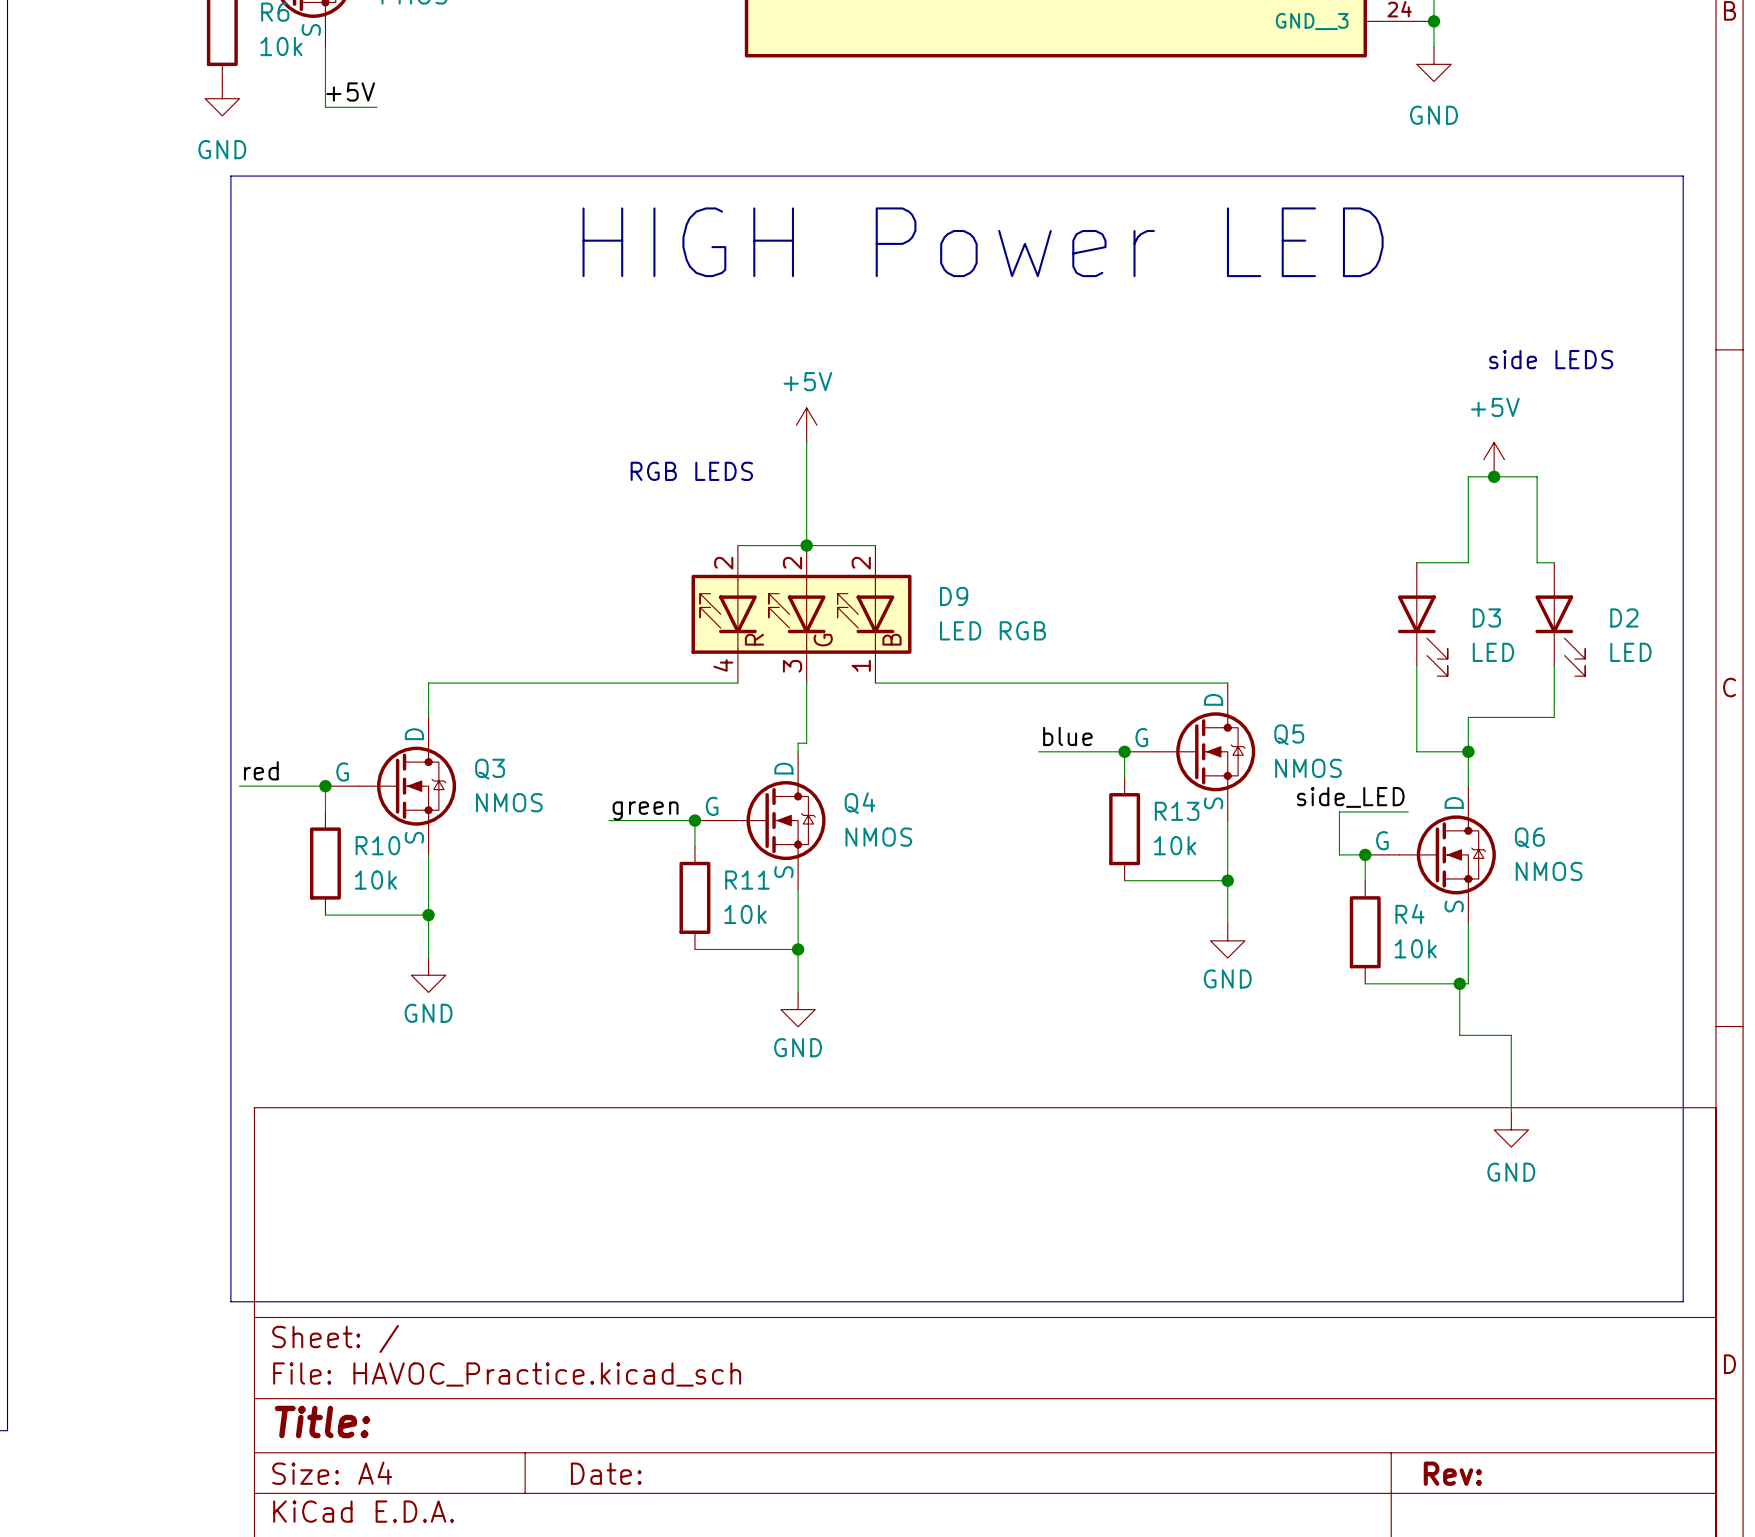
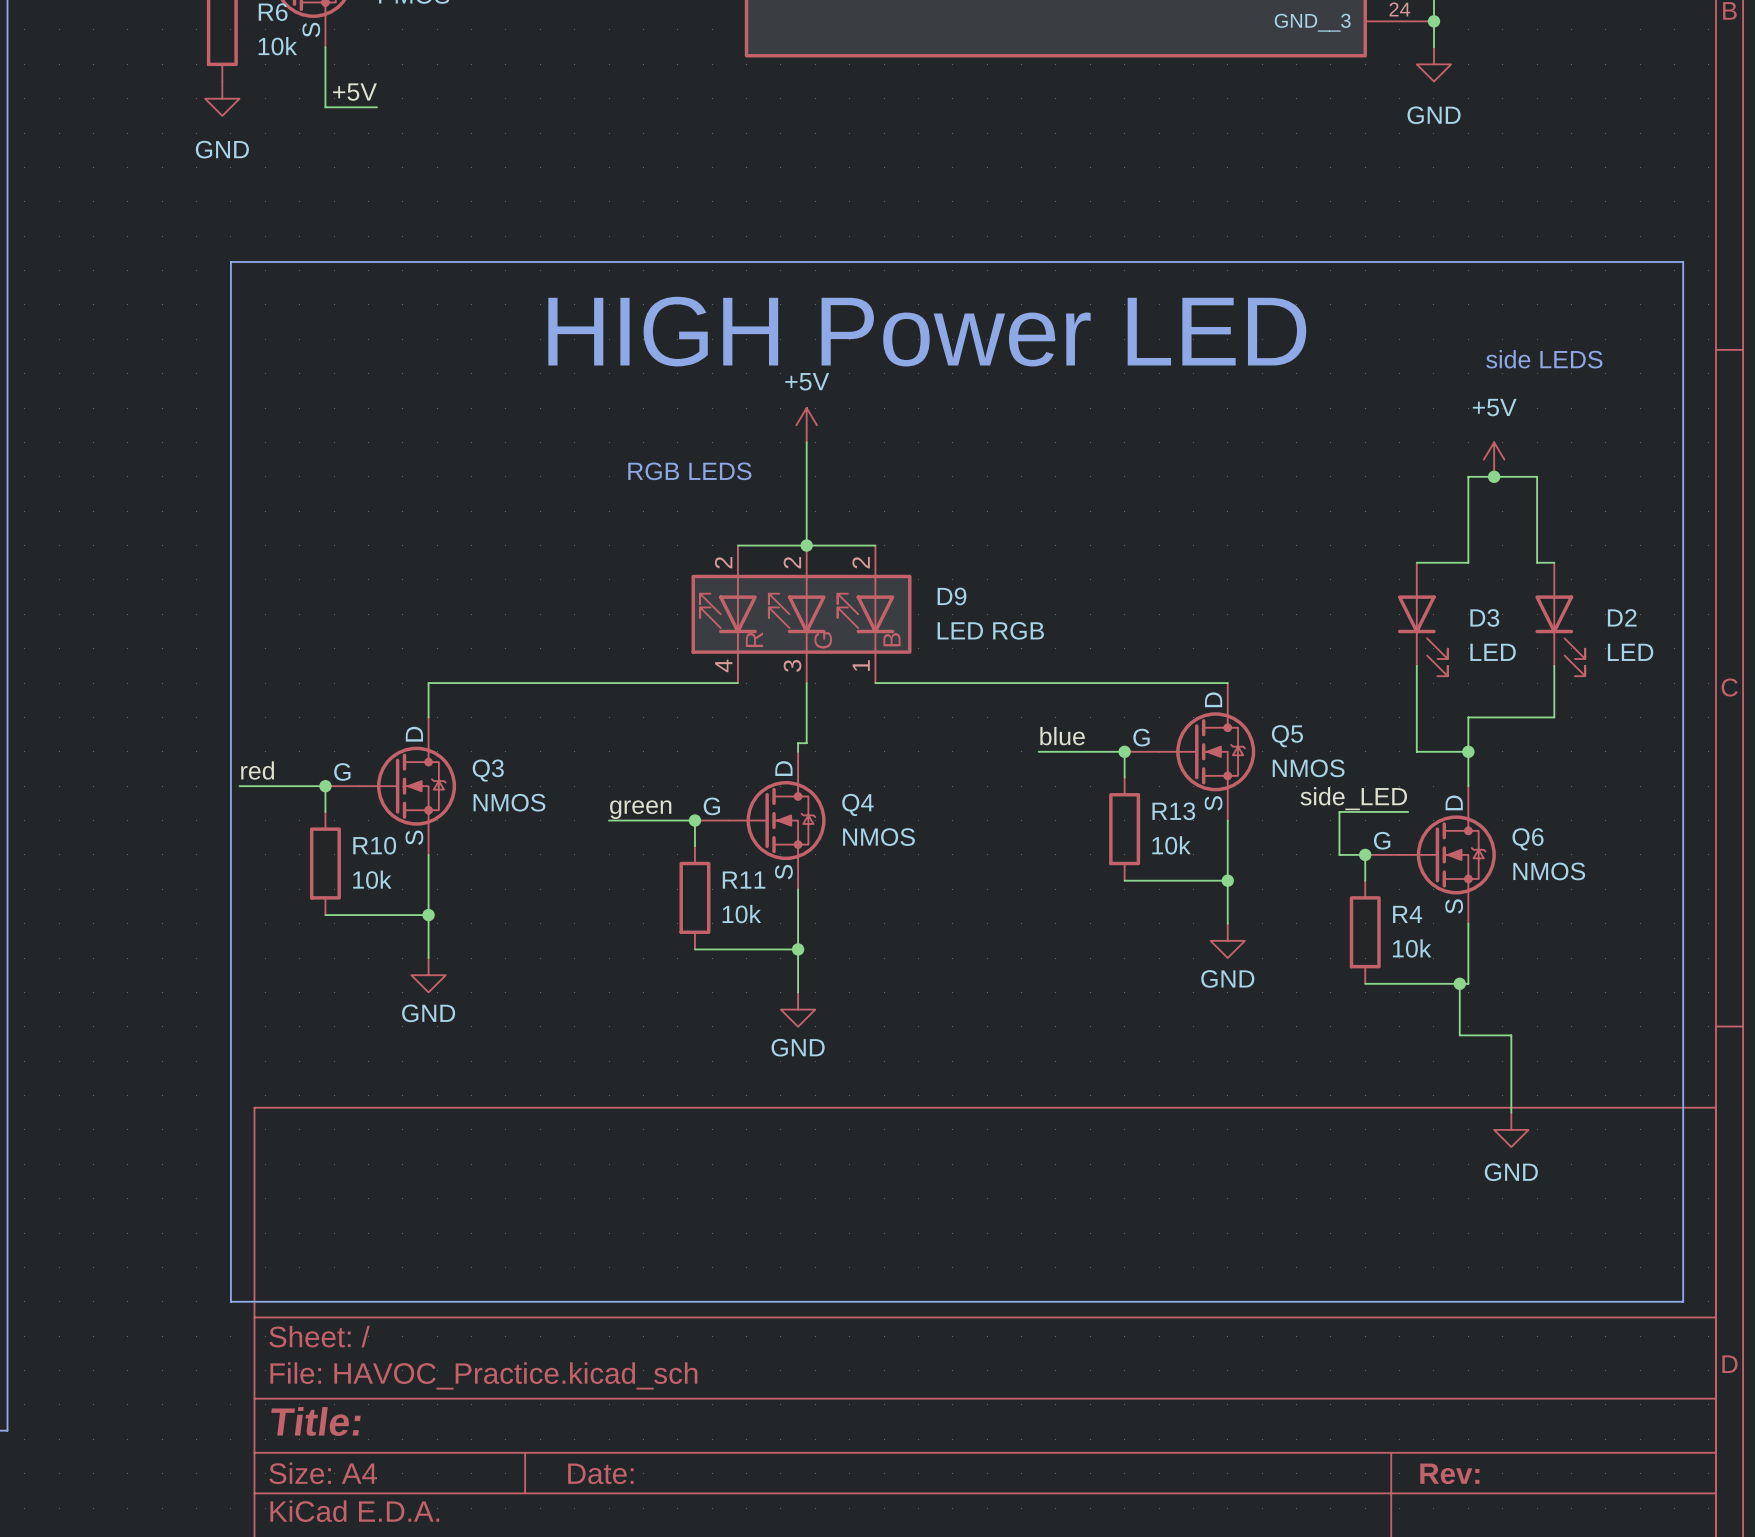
text position: HIGH Power LED (983, 242) -> HIGH Power LED (927, 331)
line: (230, 261) (230, 176) (1683, 176) (1683, 261) -> (230, 261) (1683, 261)

